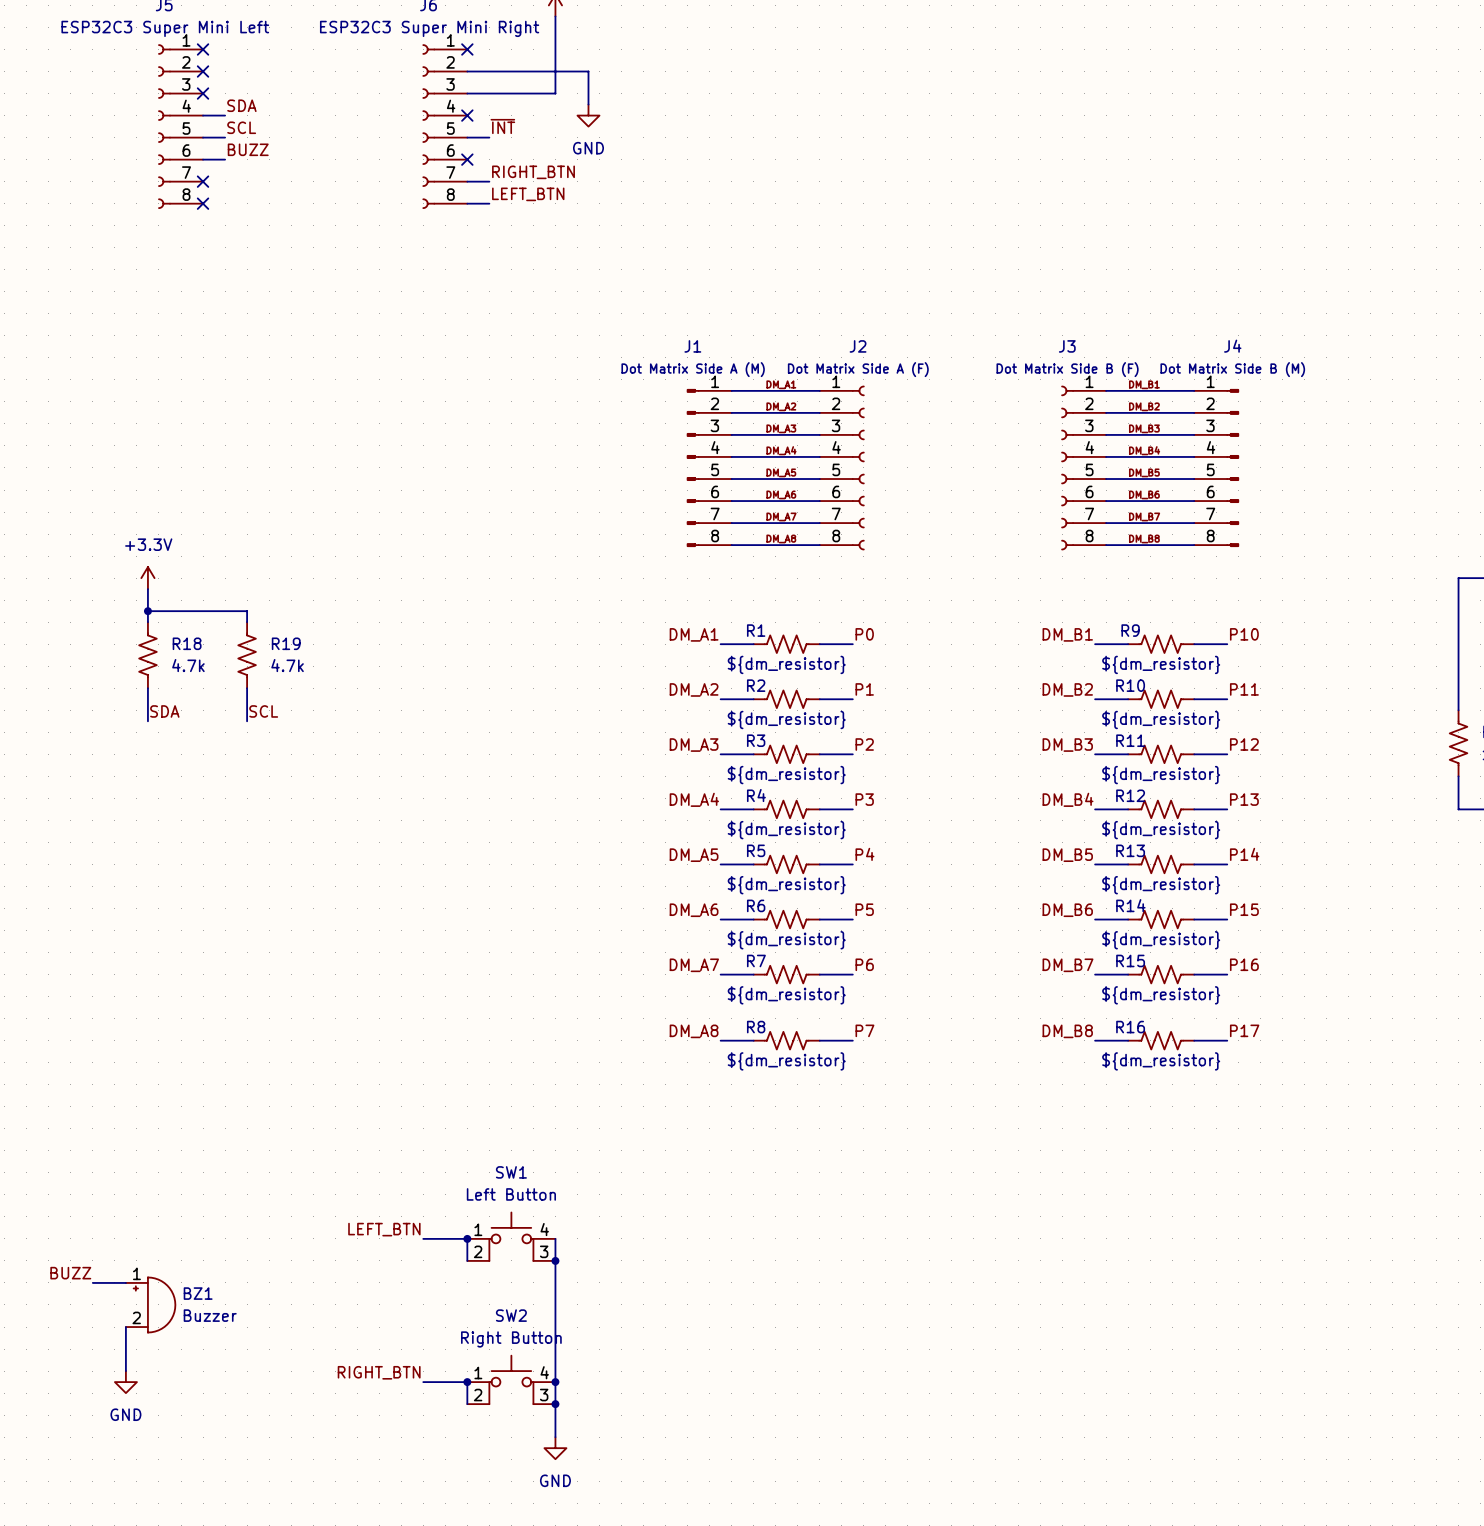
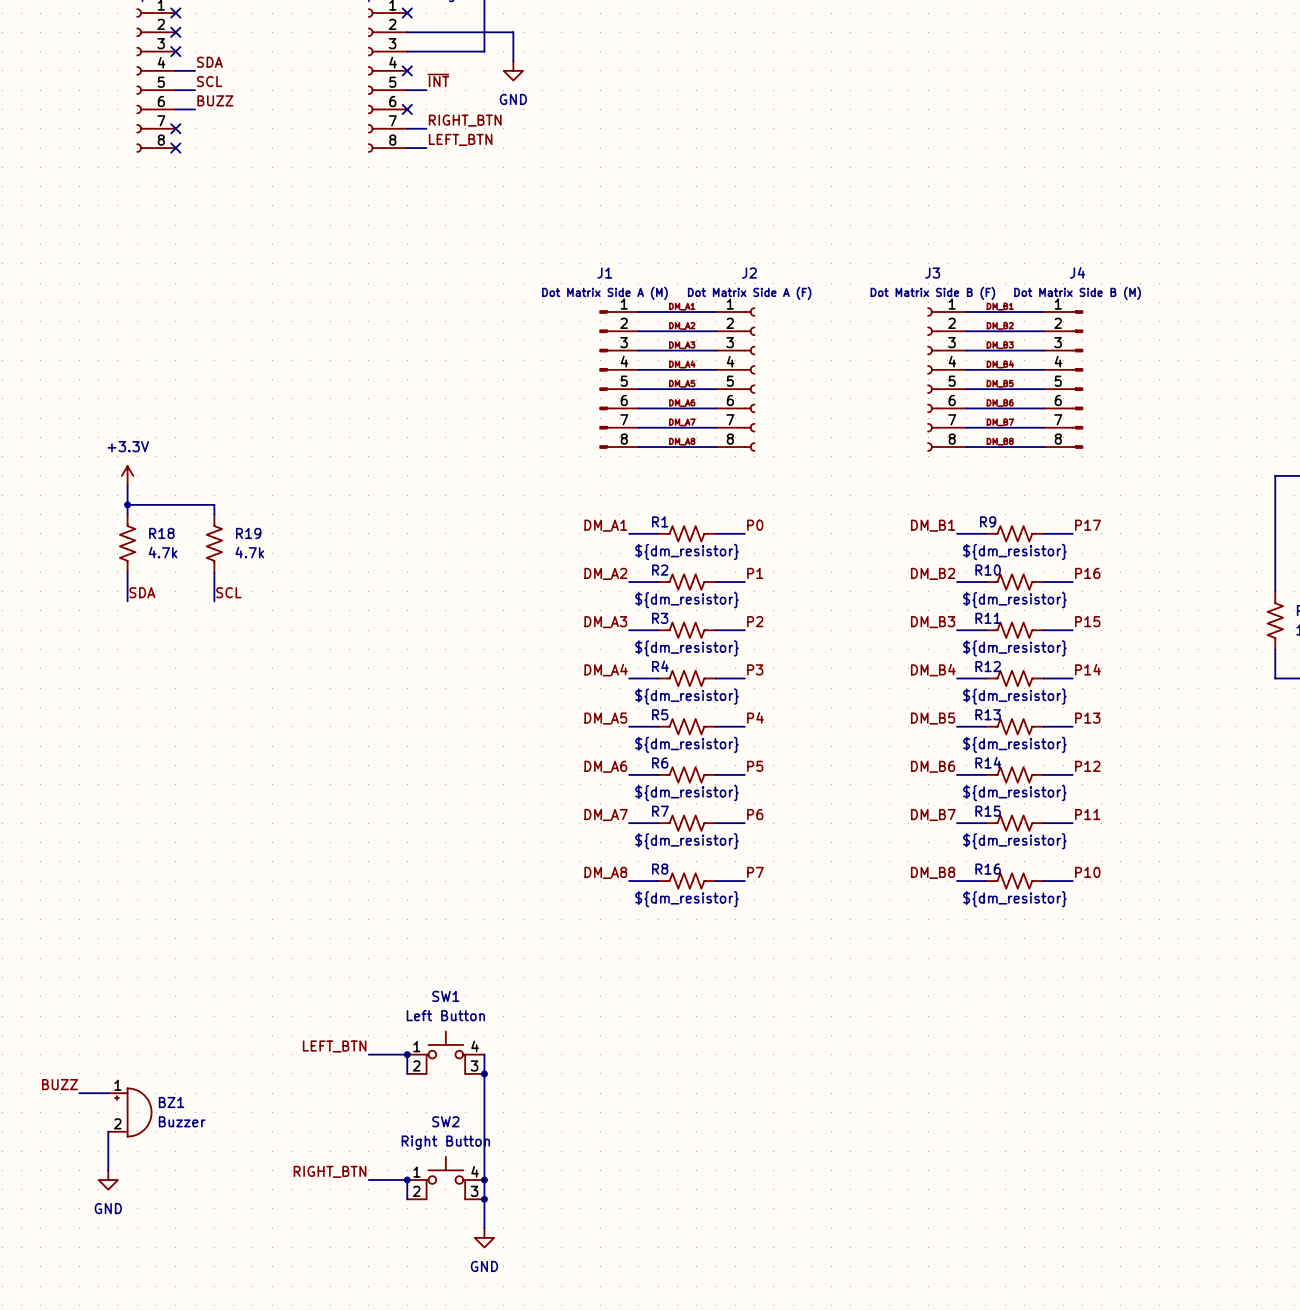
label: P10 (1244, 634) -> P17 (1087, 525)
label: P11 (1244, 689) -> P16 (1087, 573)
label: P12 (1244, 744) -> P15 (1087, 621)
label: P13 (1244, 799) -> P14 (1087, 669)
label: P14 (1244, 854) -> P13 (1087, 718)
label: P15 (1244, 909) -> P12 (1087, 766)
label: P16 (1244, 964) -> P11 (1087, 814)
label: P17 (1244, 1030) -> P10 (1087, 872)

